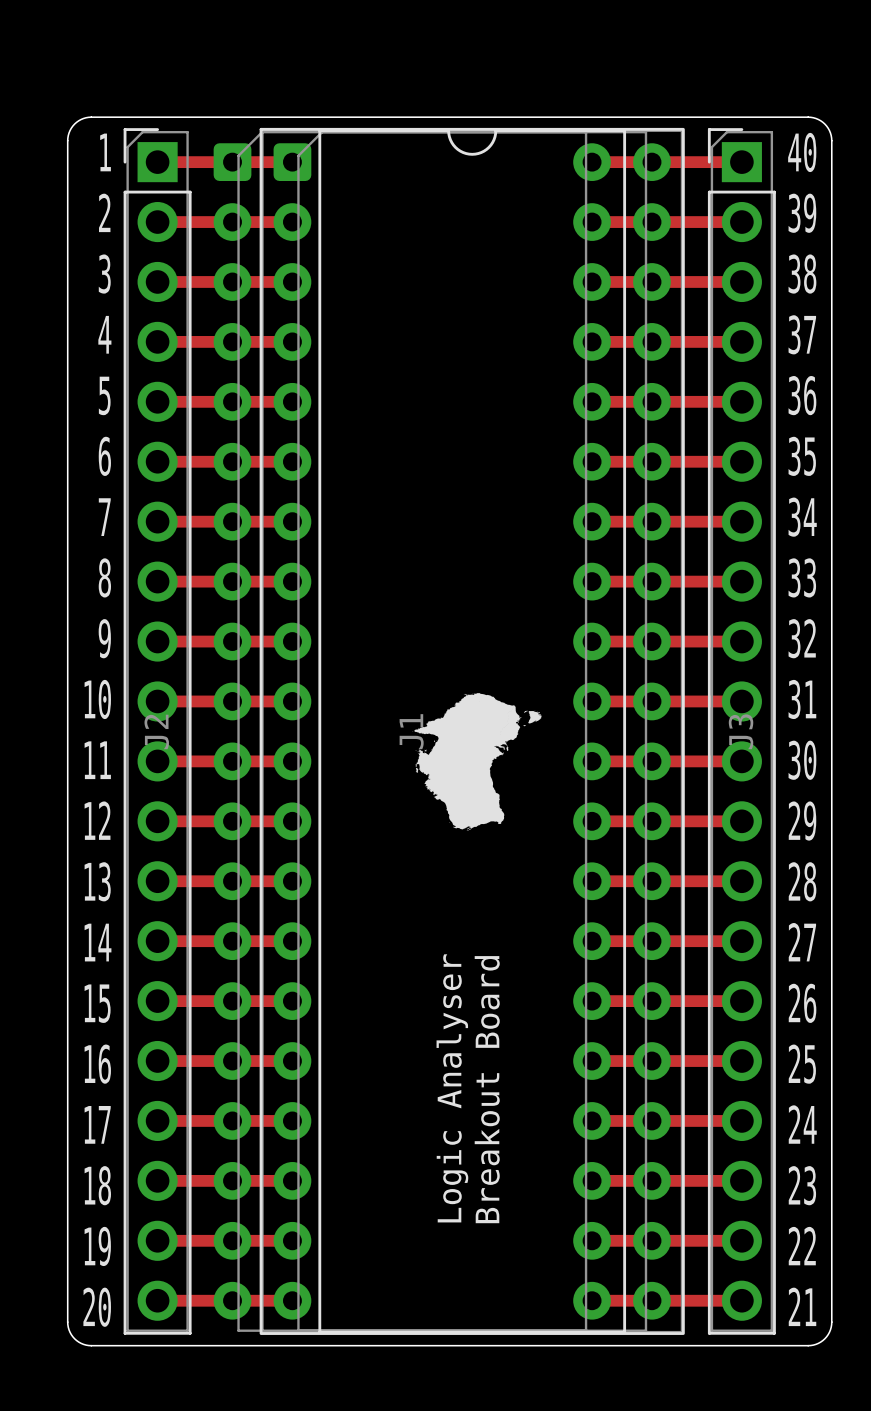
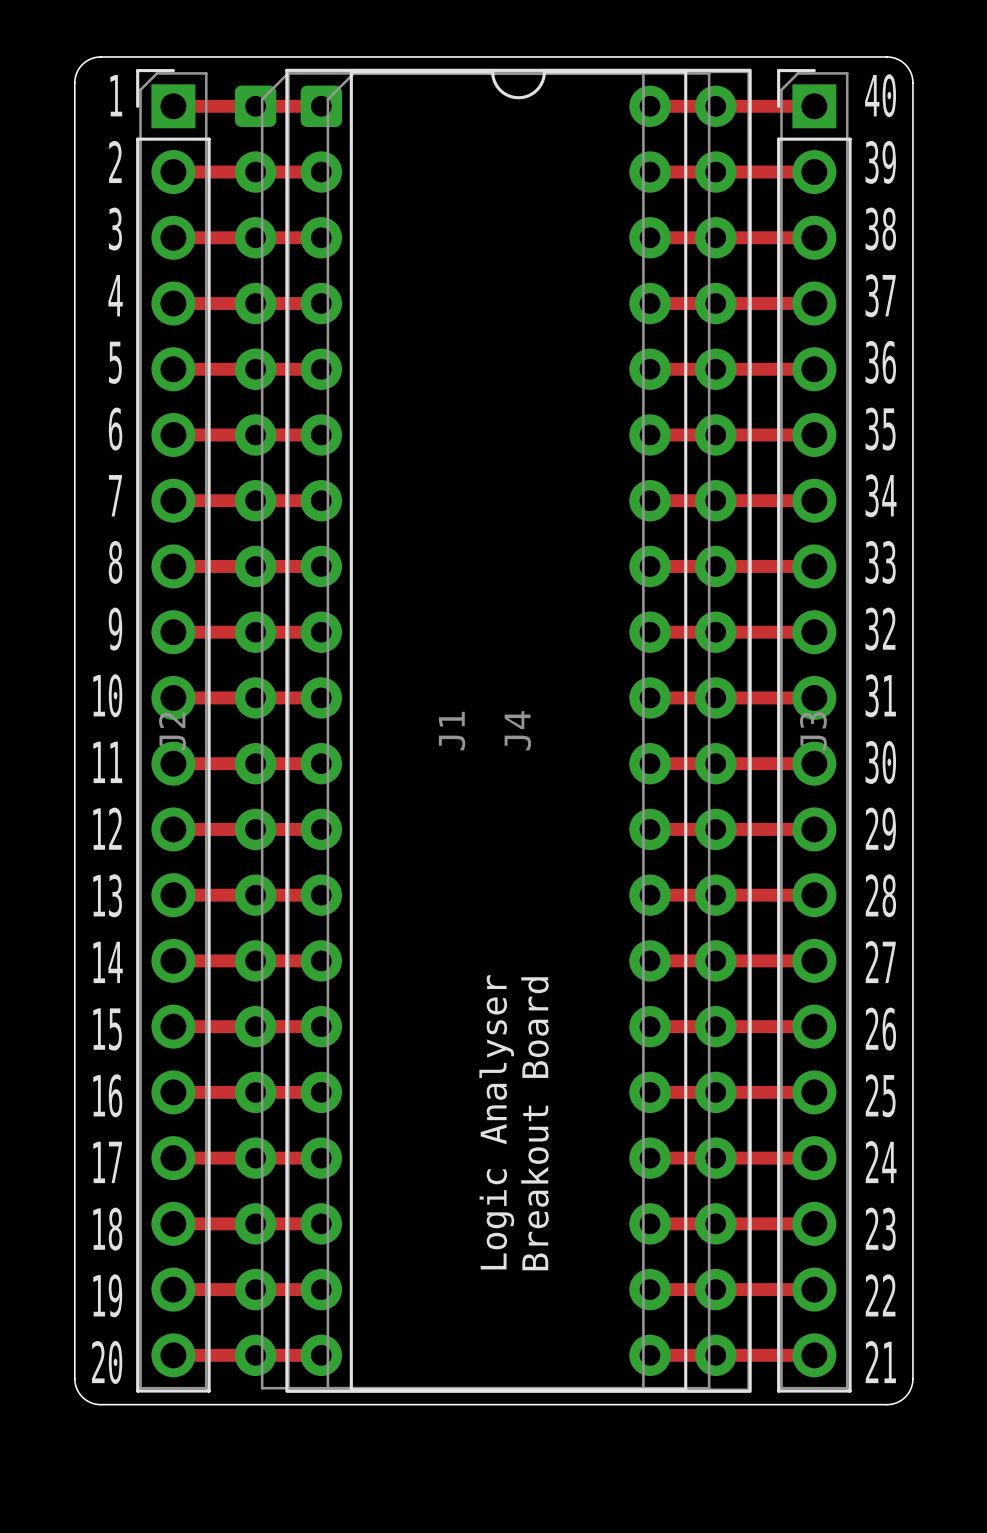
drawing: [412, 693, 542, 831] -> none

